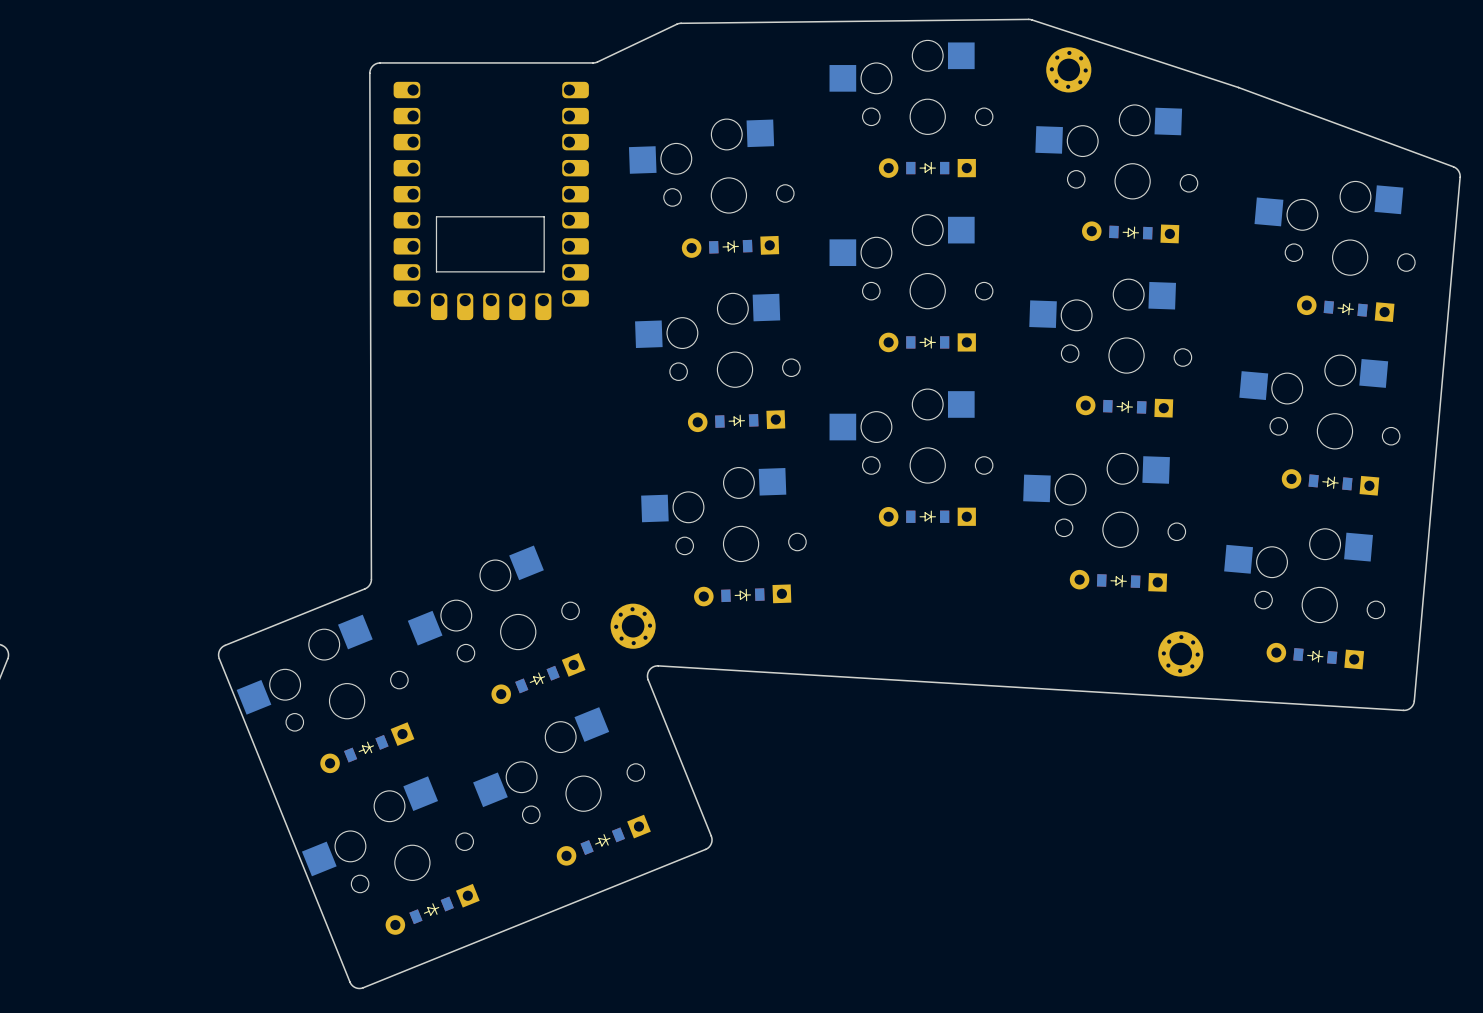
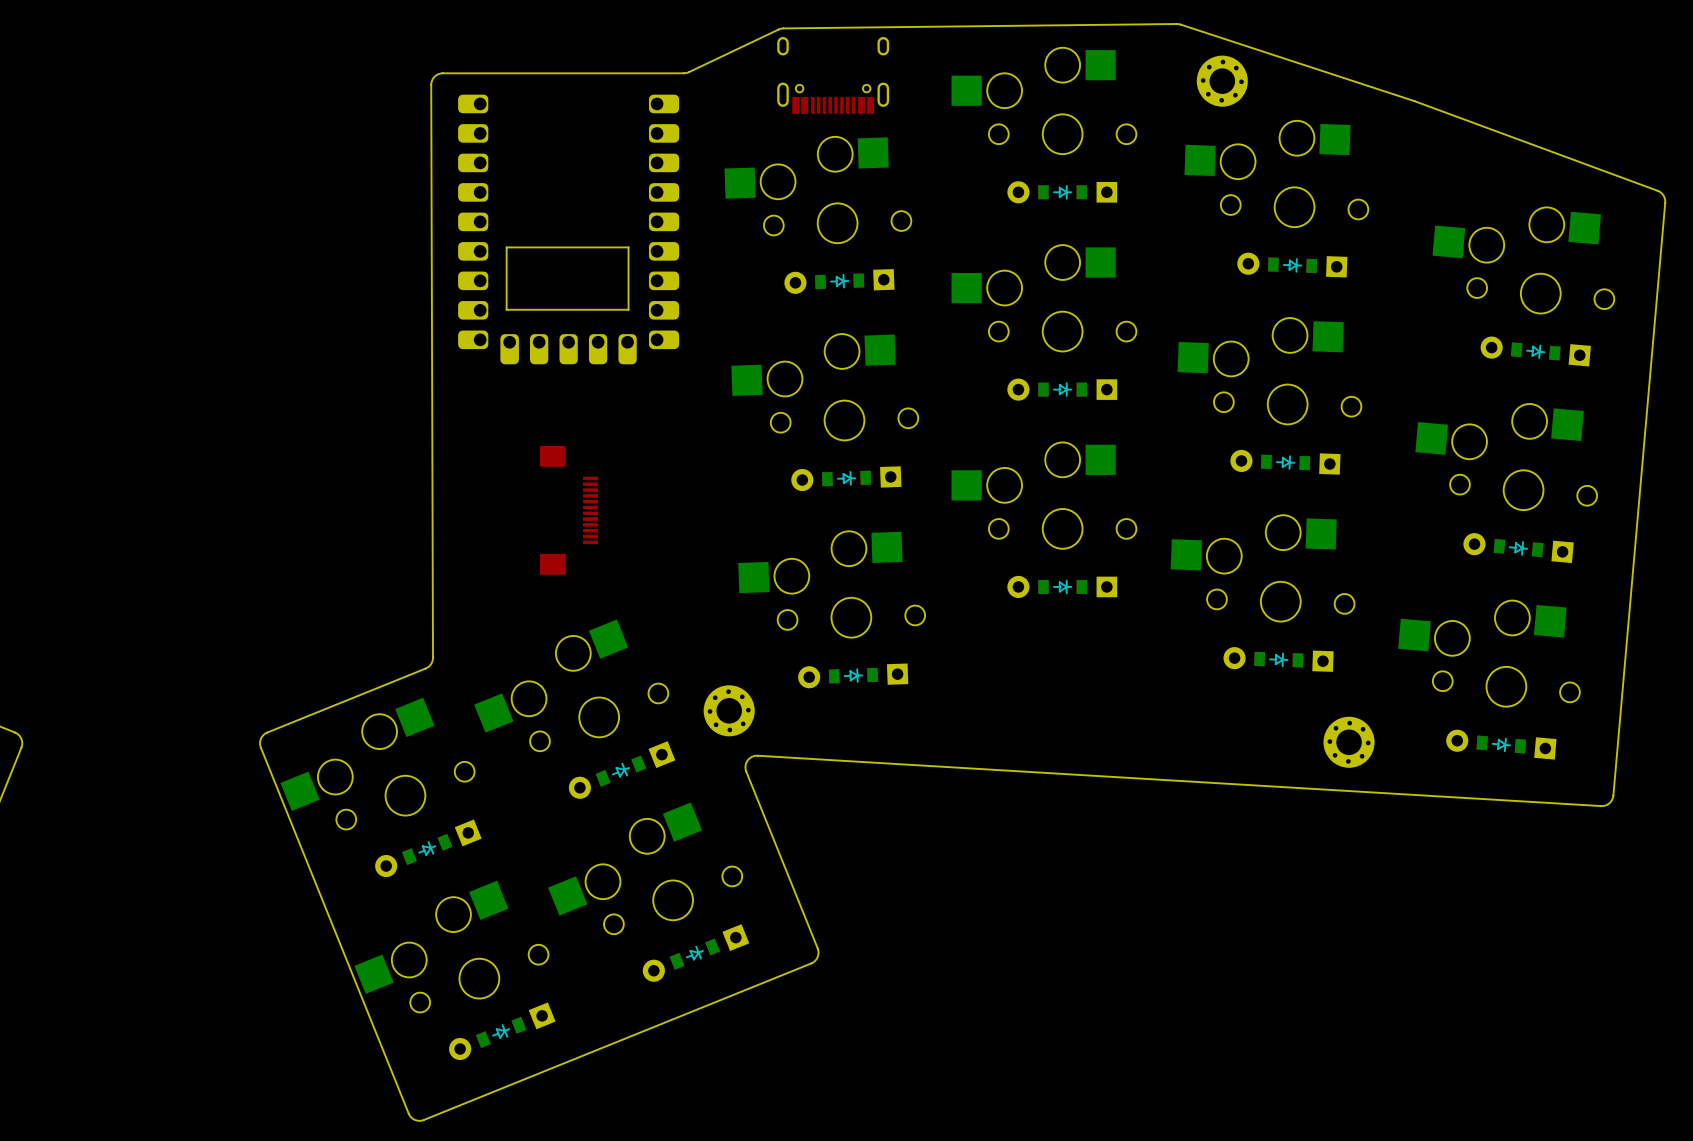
part: none -> (833, 75)
part: none -> (569, 510)

